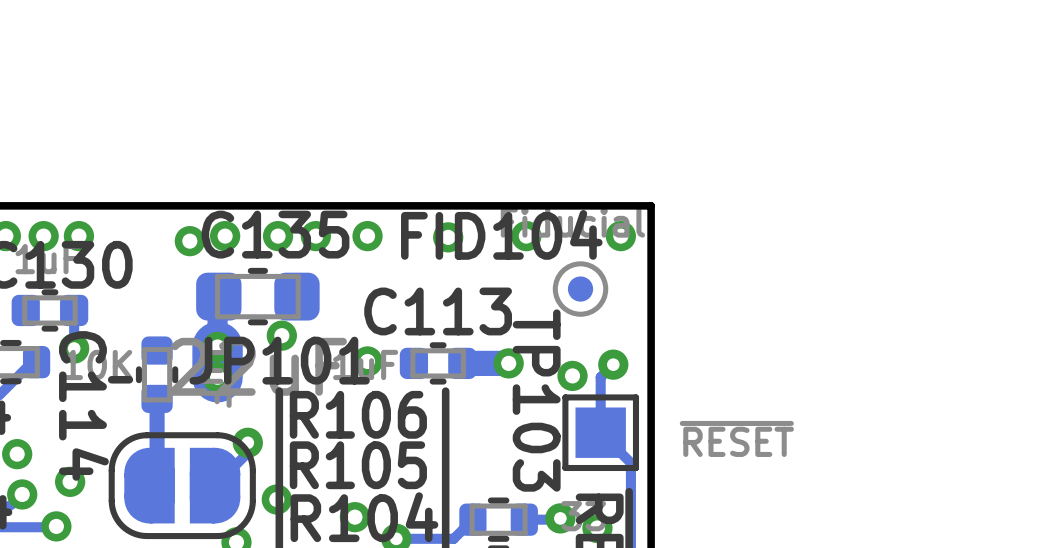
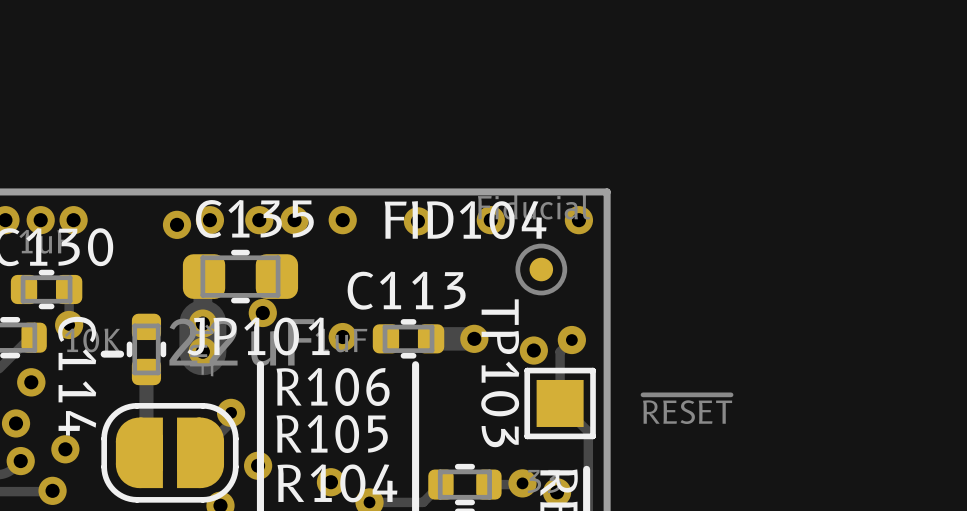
via: none -> (31, 382)

